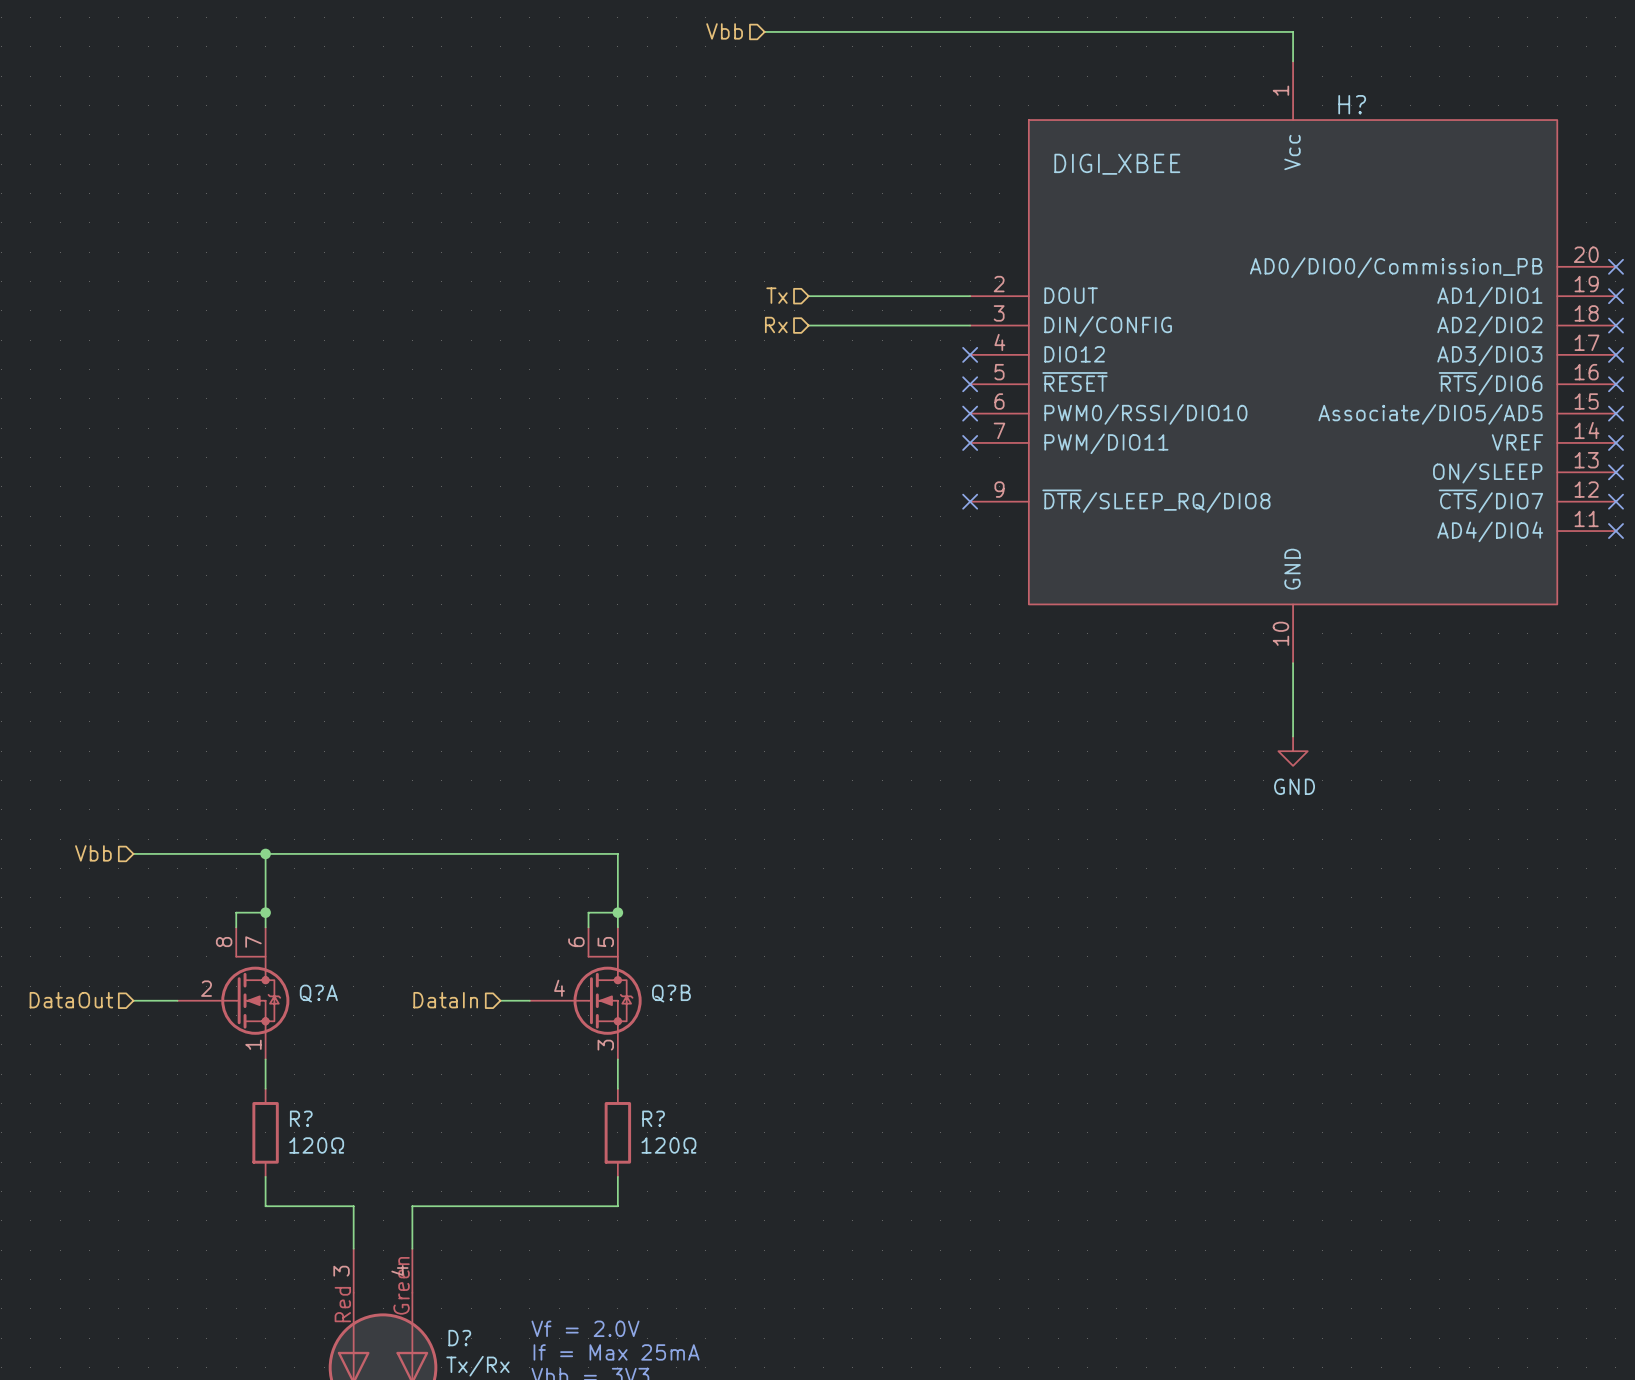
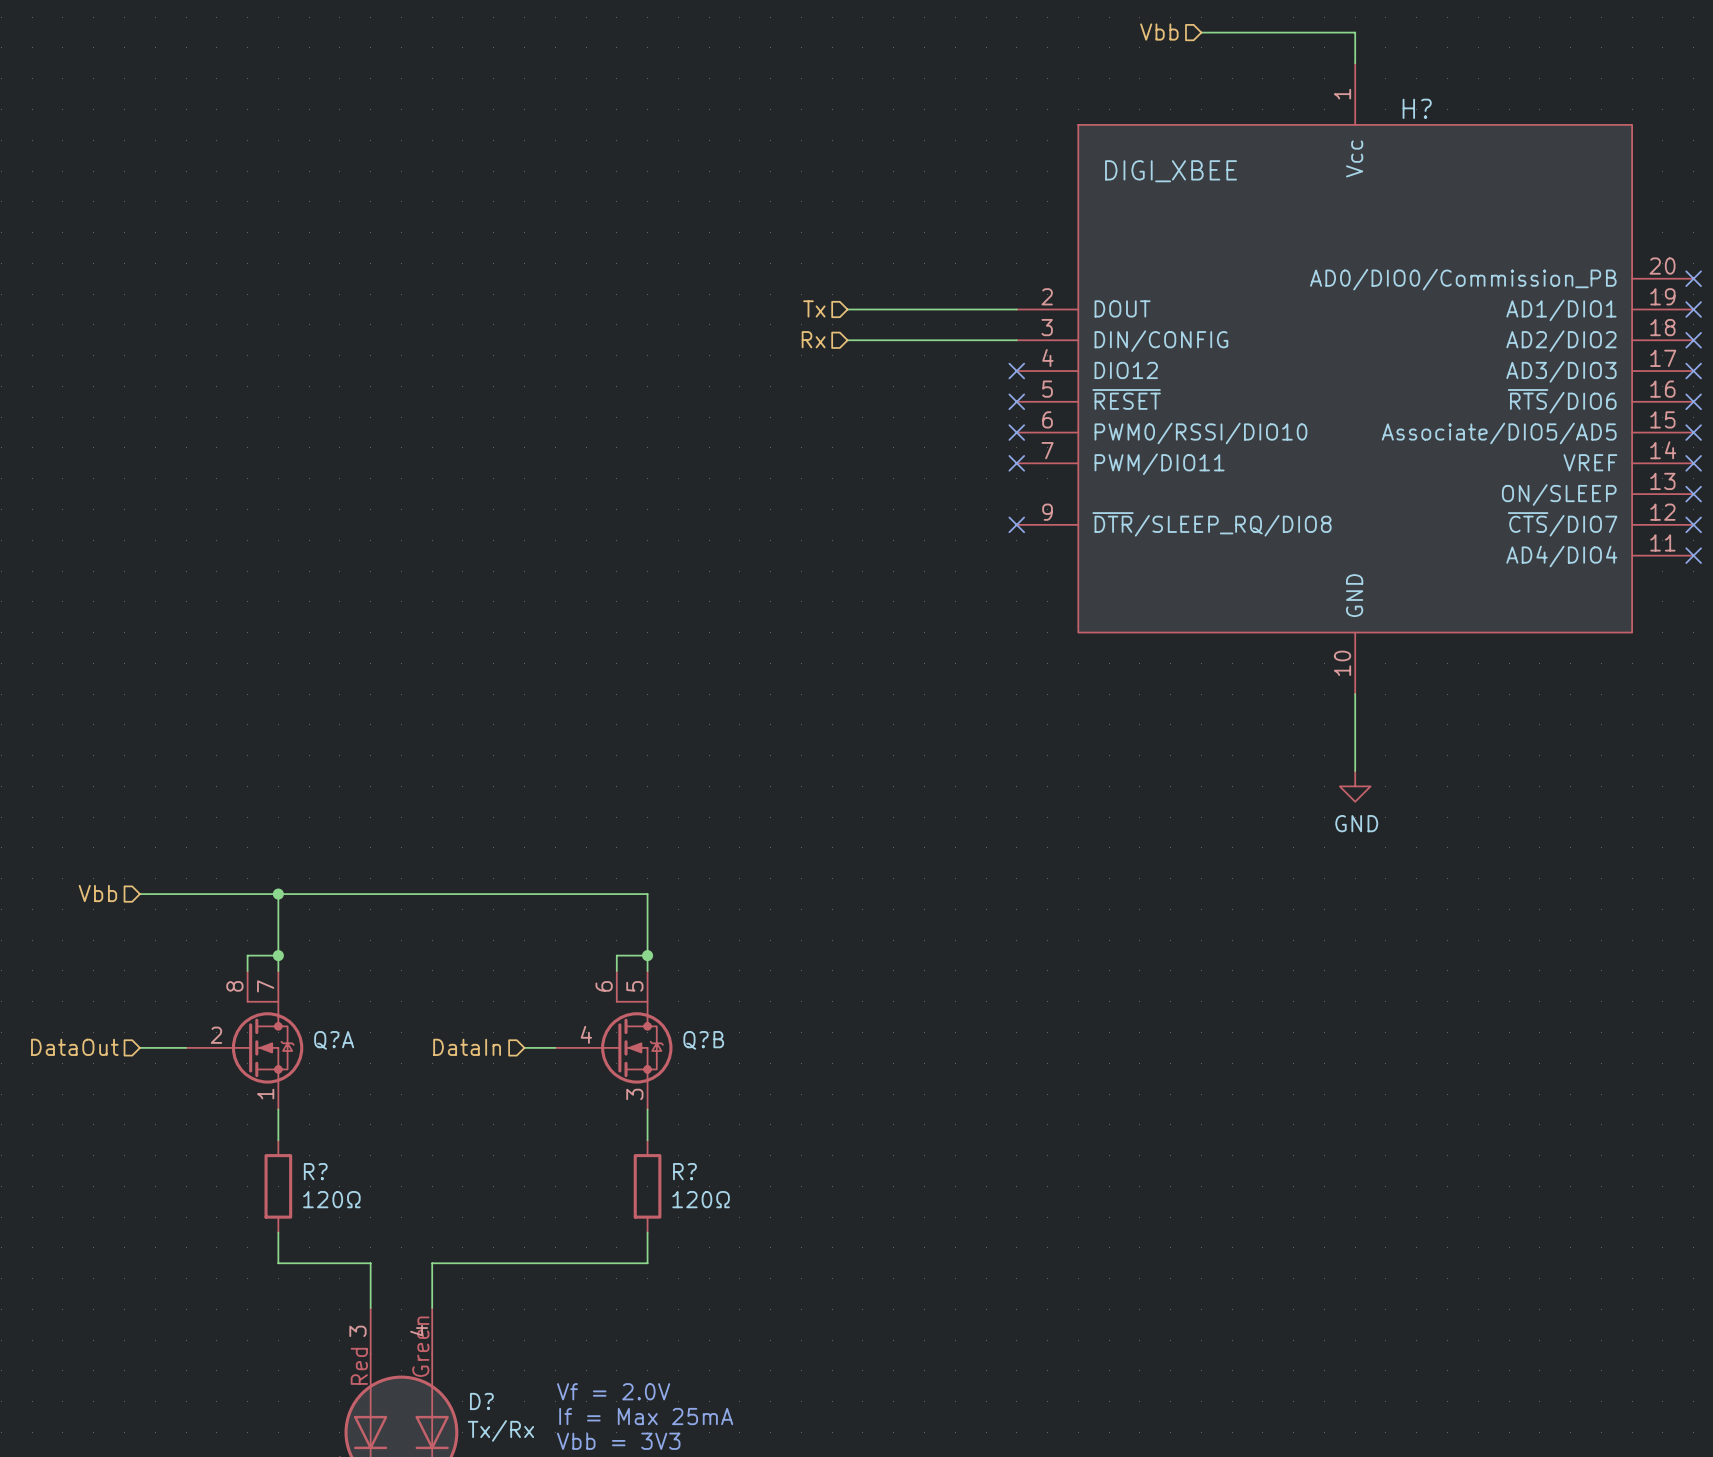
hierarchical label: Vbb (724, 31) -> none
wire: (764, 31) (1146, 31) -> none
hierarchical label: none -> Vbb (1159, 32)

